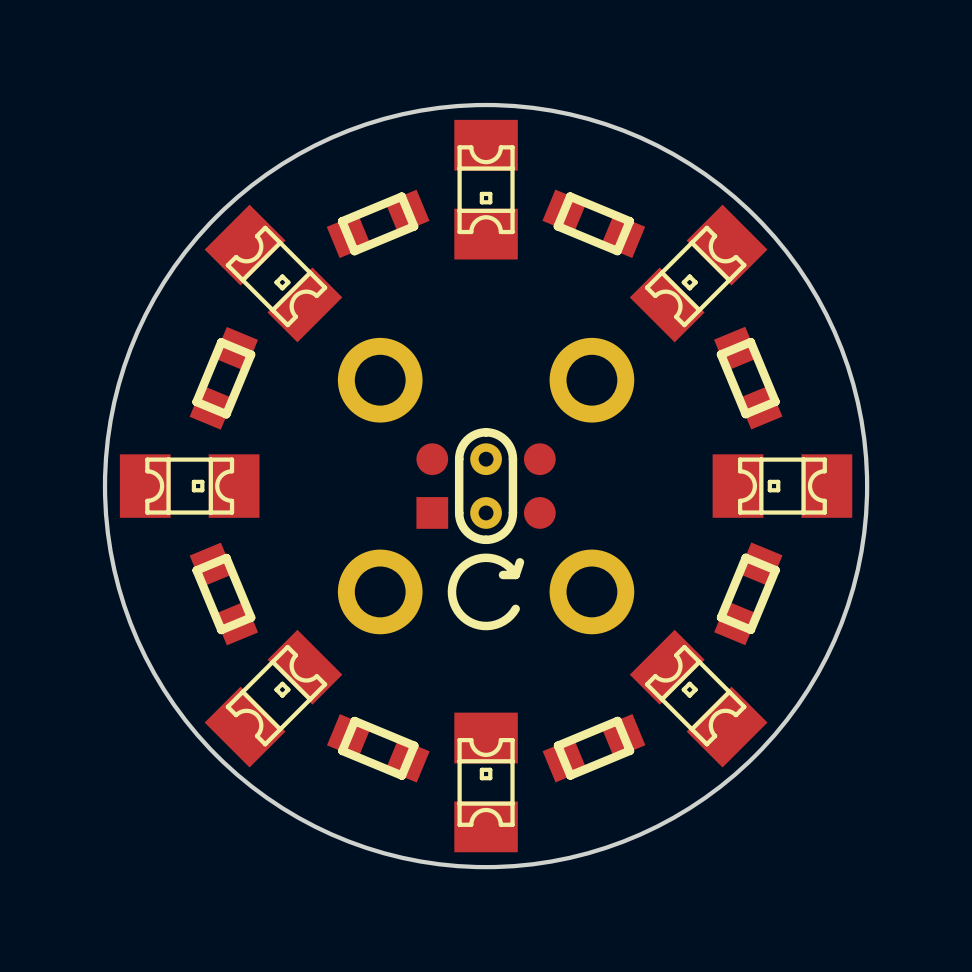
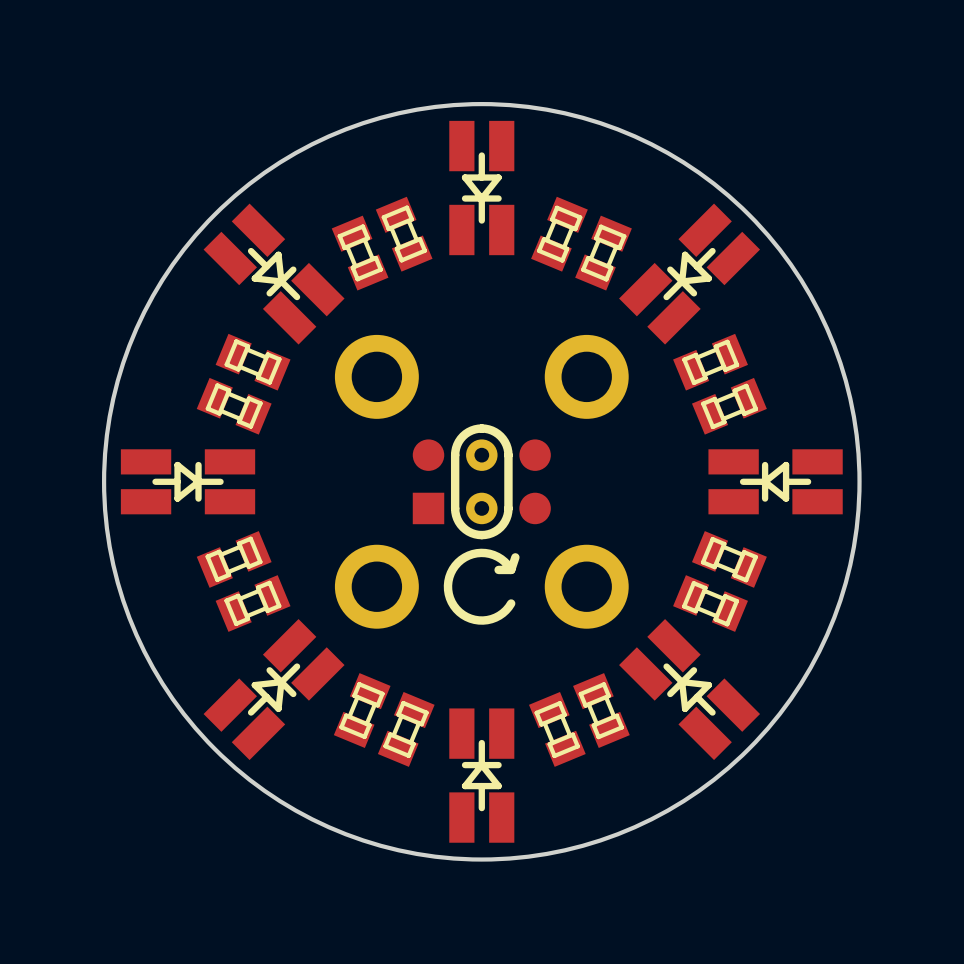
part footprint: [454, 119, 518, 260] -> [449, 120, 515, 256]
part footprint: [204, 204, 343, 343] -> [203, 203, 345, 345]
part footprint: [629, 204, 768, 343] -> [619, 203, 761, 345]
part: (378, 223) -> none
part: (593, 223) -> none
part: none -> (404, 234)
part: none -> (559, 234)
part: none -> (360, 253)
part: none -> (603, 253)
part: none -> (253, 362)
part: none -> (710, 362)
part: (223, 378) -> none
part: (748, 378) -> none
part: none -> (234, 406)
part: none -> (729, 406)
part footprint: [119, 454, 260, 518] -> [120, 449, 256, 515]
part footprint: [712, 454, 853, 518] -> [708, 449, 843, 515]
part: none -> (234, 559)
part: none -> (729, 559)
part: (748, 593) -> none
part: (223, 594) -> none
part: none -> (253, 603)
part: none -> (710, 603)
part footprint: [204, 629, 343, 768] -> [203, 619, 345, 761]
part footprint: [629, 629, 768, 768] -> [619, 619, 761, 761]
part footprint: [454, 712, 518, 853] -> [449, 708, 515, 843]
part: none -> (362, 710)
part: none -> (601, 710)
part: none -> (406, 729)
part: none -> (557, 729)
part: (378, 748) -> none
part: (594, 748) -> none

